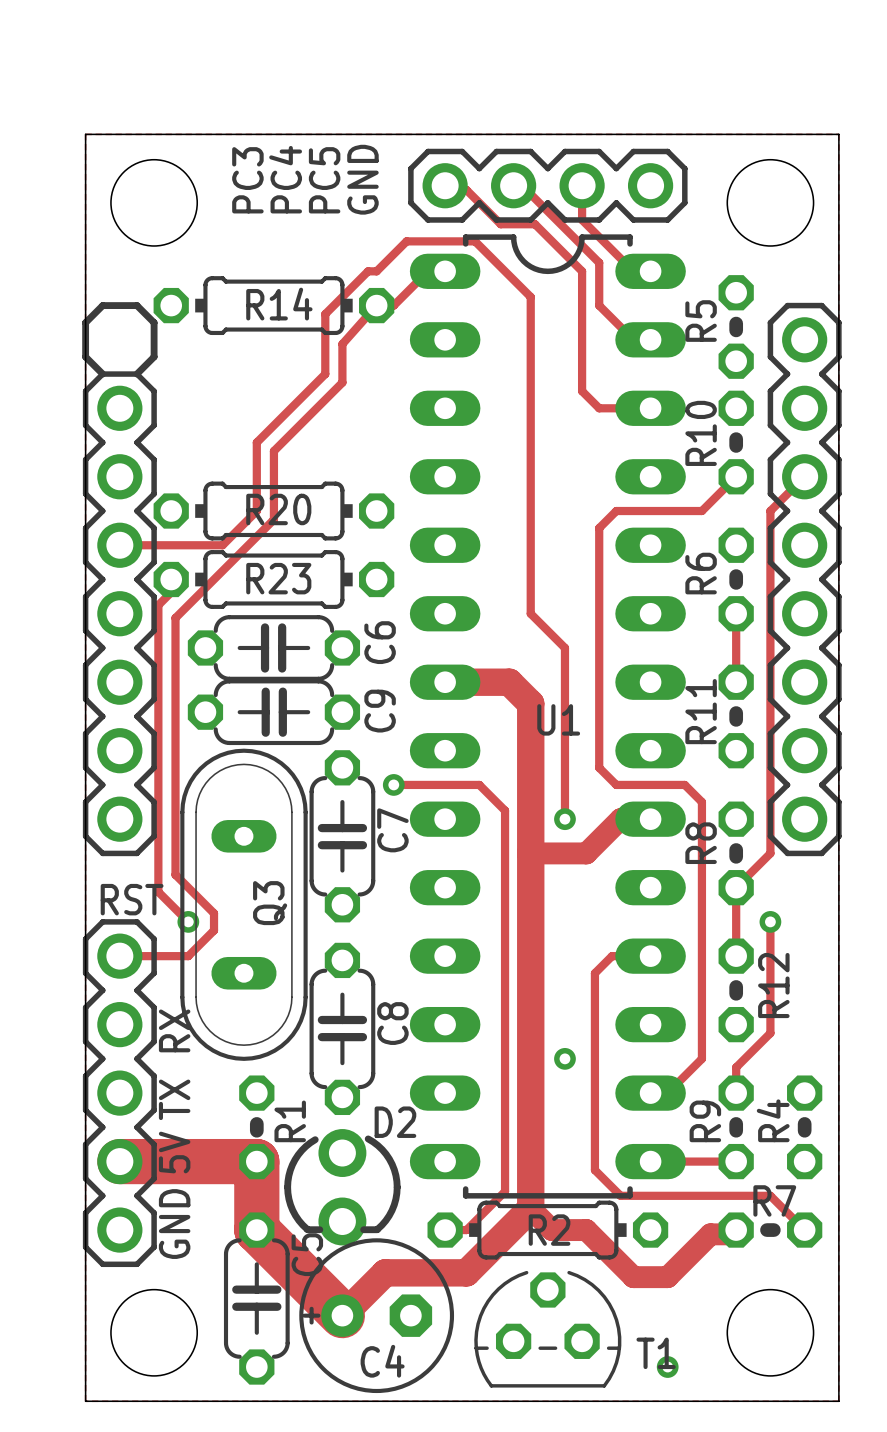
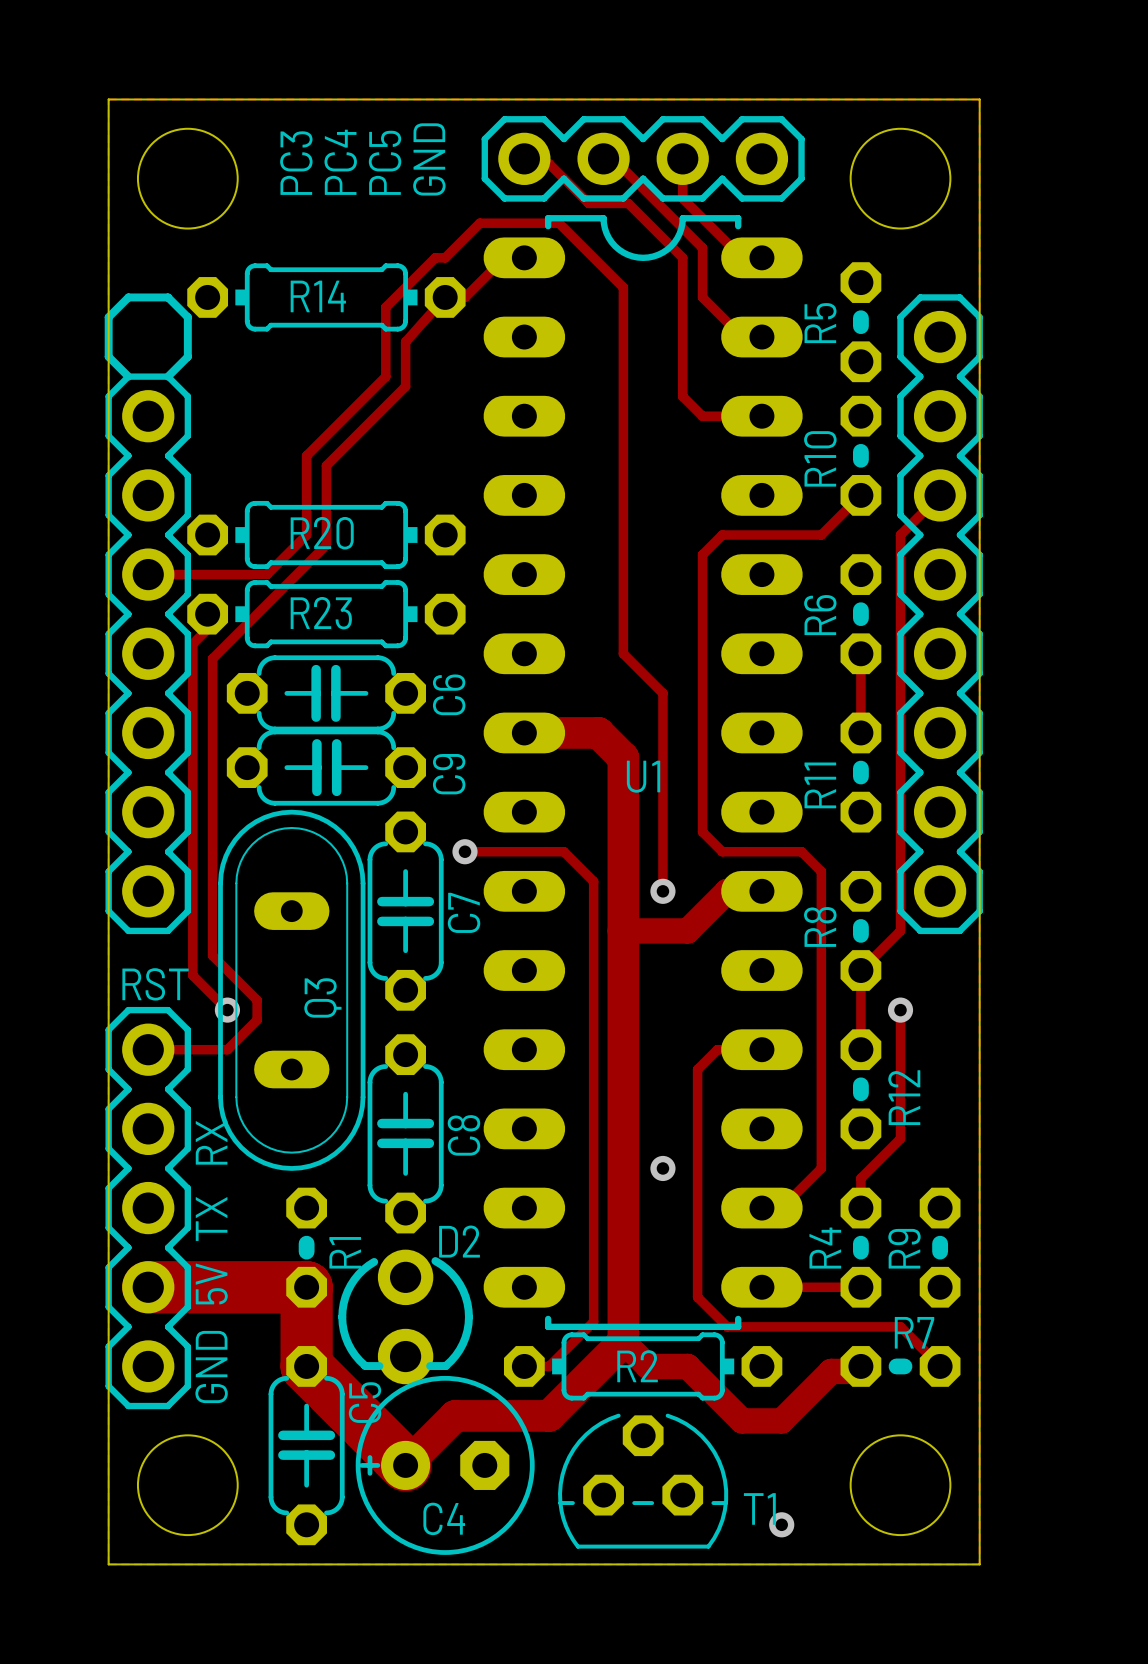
R4 name position: R4 (773, 1120) -> R4 (825, 1248)
R9 name position: R9 (705, 1121) -> R9 (904, 1248)

